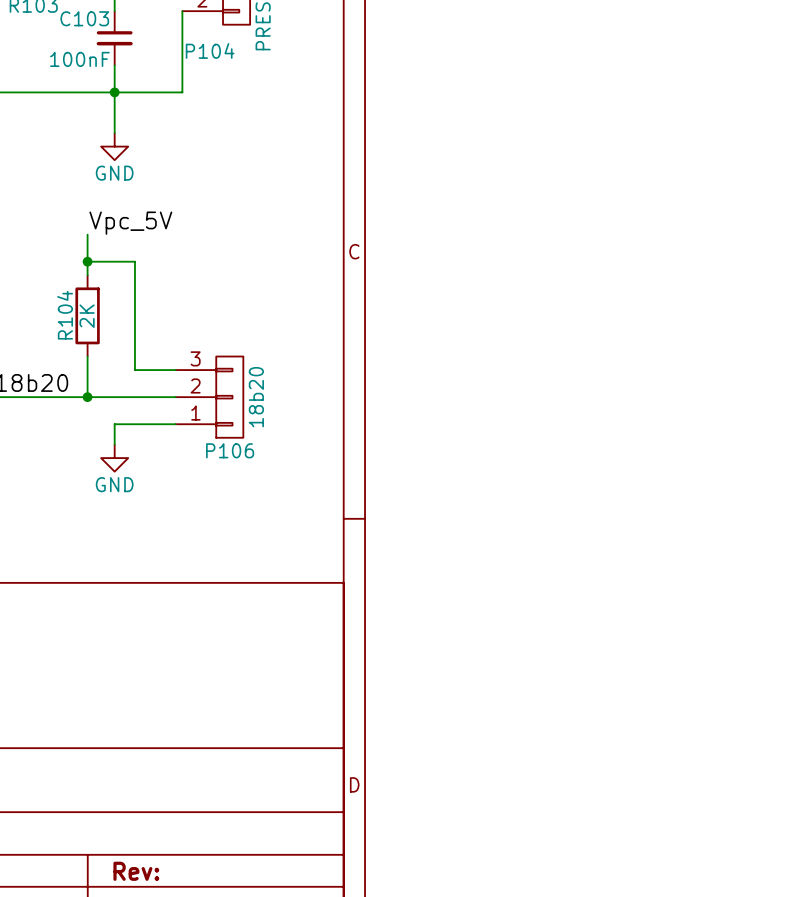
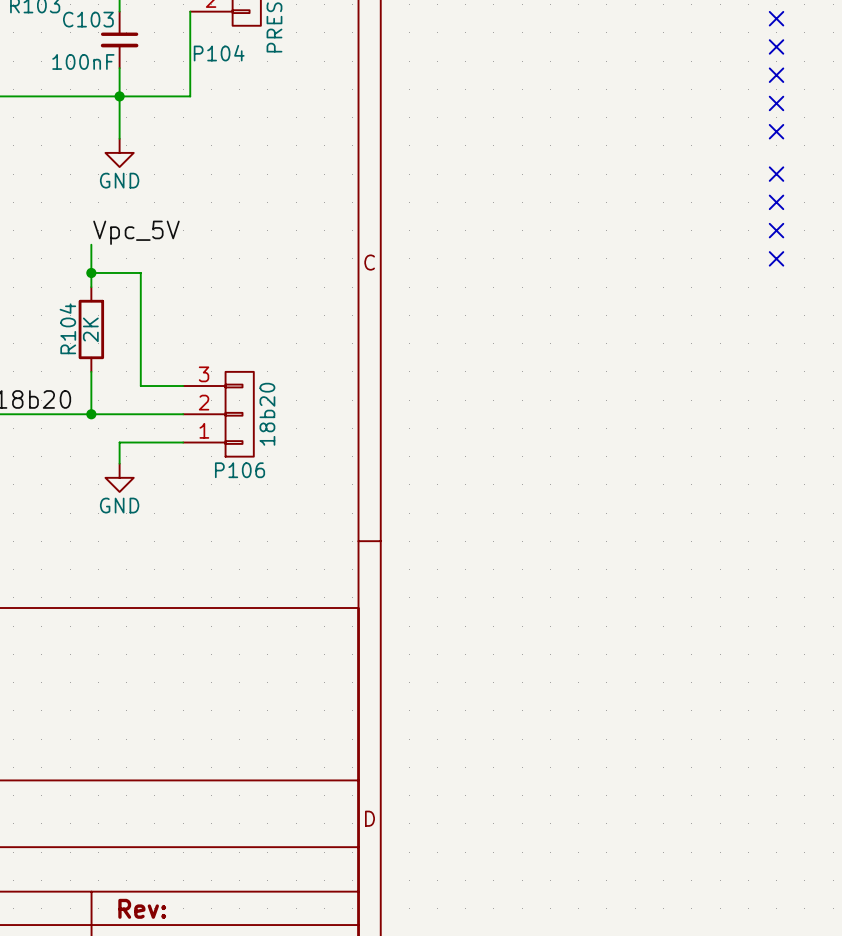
no-connect mark: none -> (776, 18)
no-connect mark: none -> (776, 46)
no-connect mark: none -> (776, 75)
no-connect mark: none -> (776, 103)
no-connect mark: none -> (776, 131)
no-connect mark: none -> (776, 174)
no-connect mark: none -> (776, 202)
no-connect mark: none -> (776, 230)
no-connect mark: none -> (776, 258)

